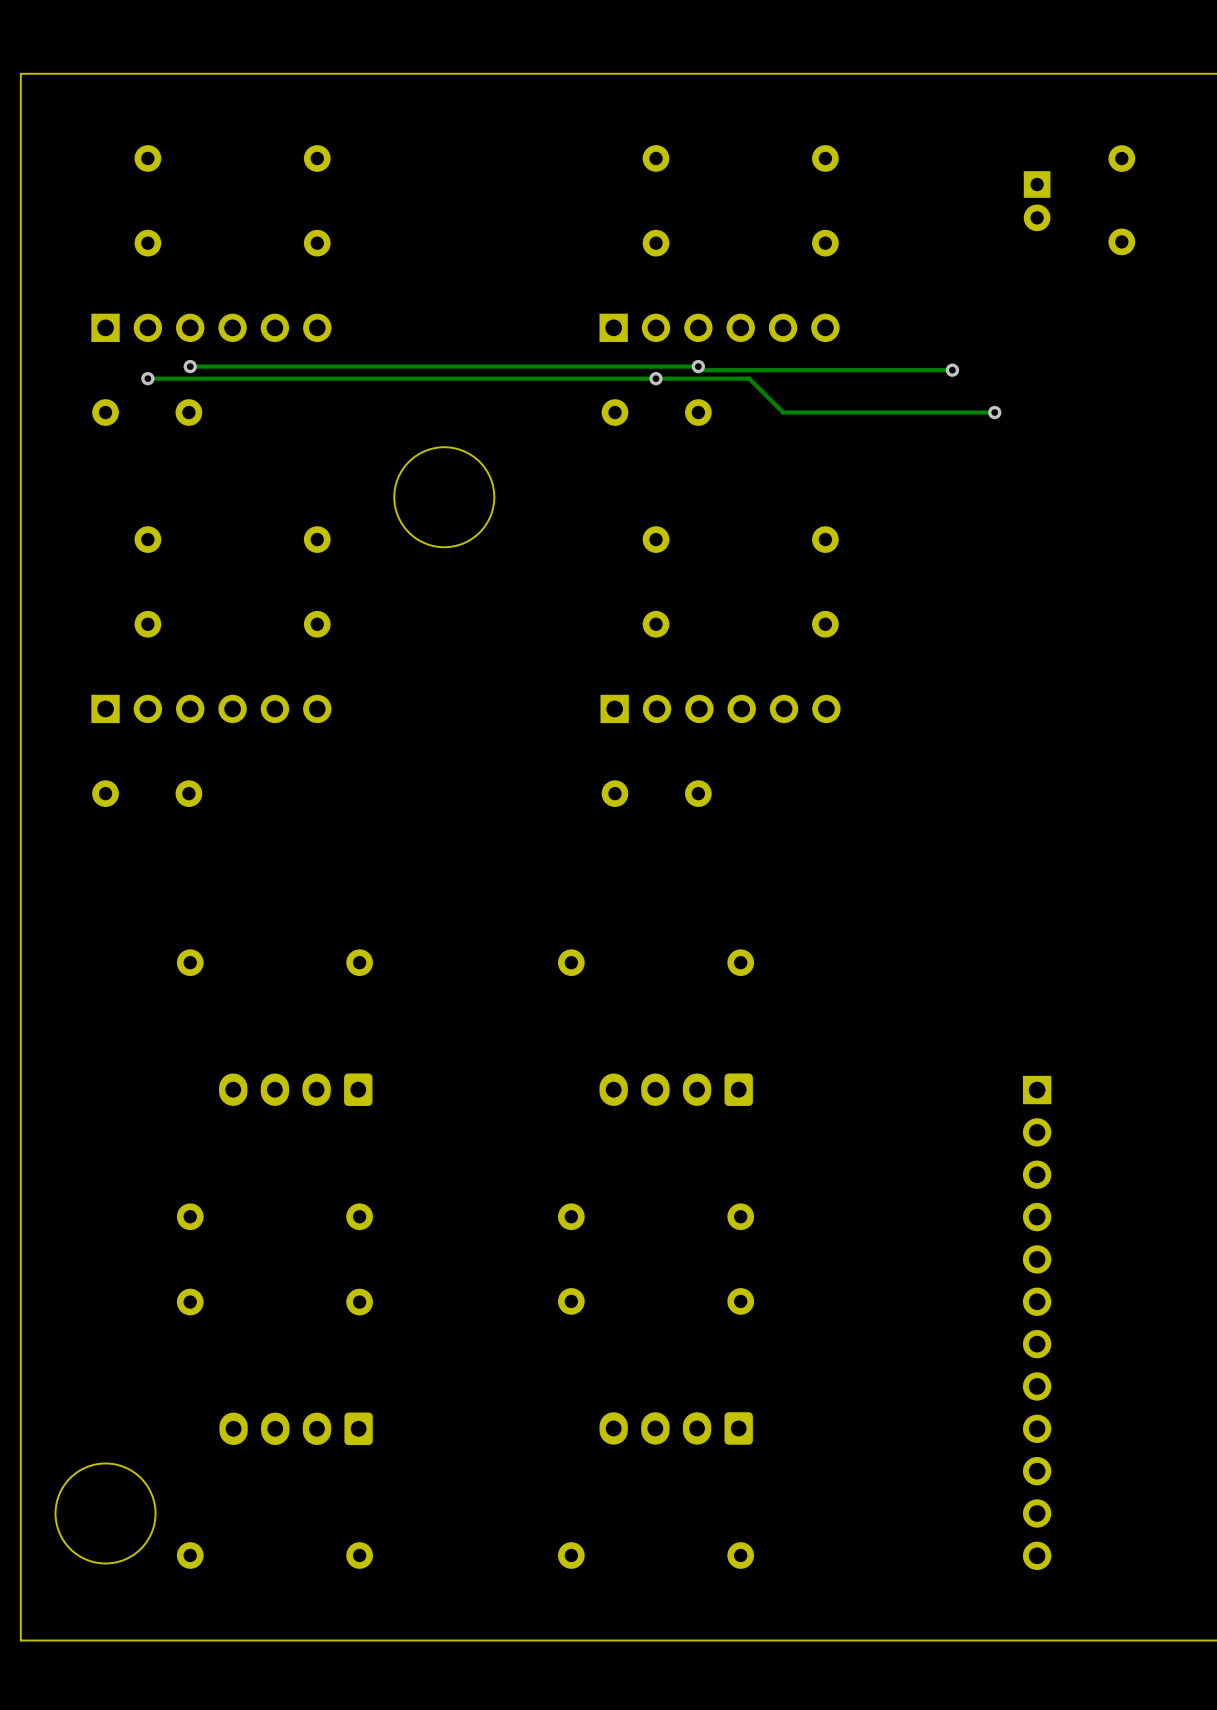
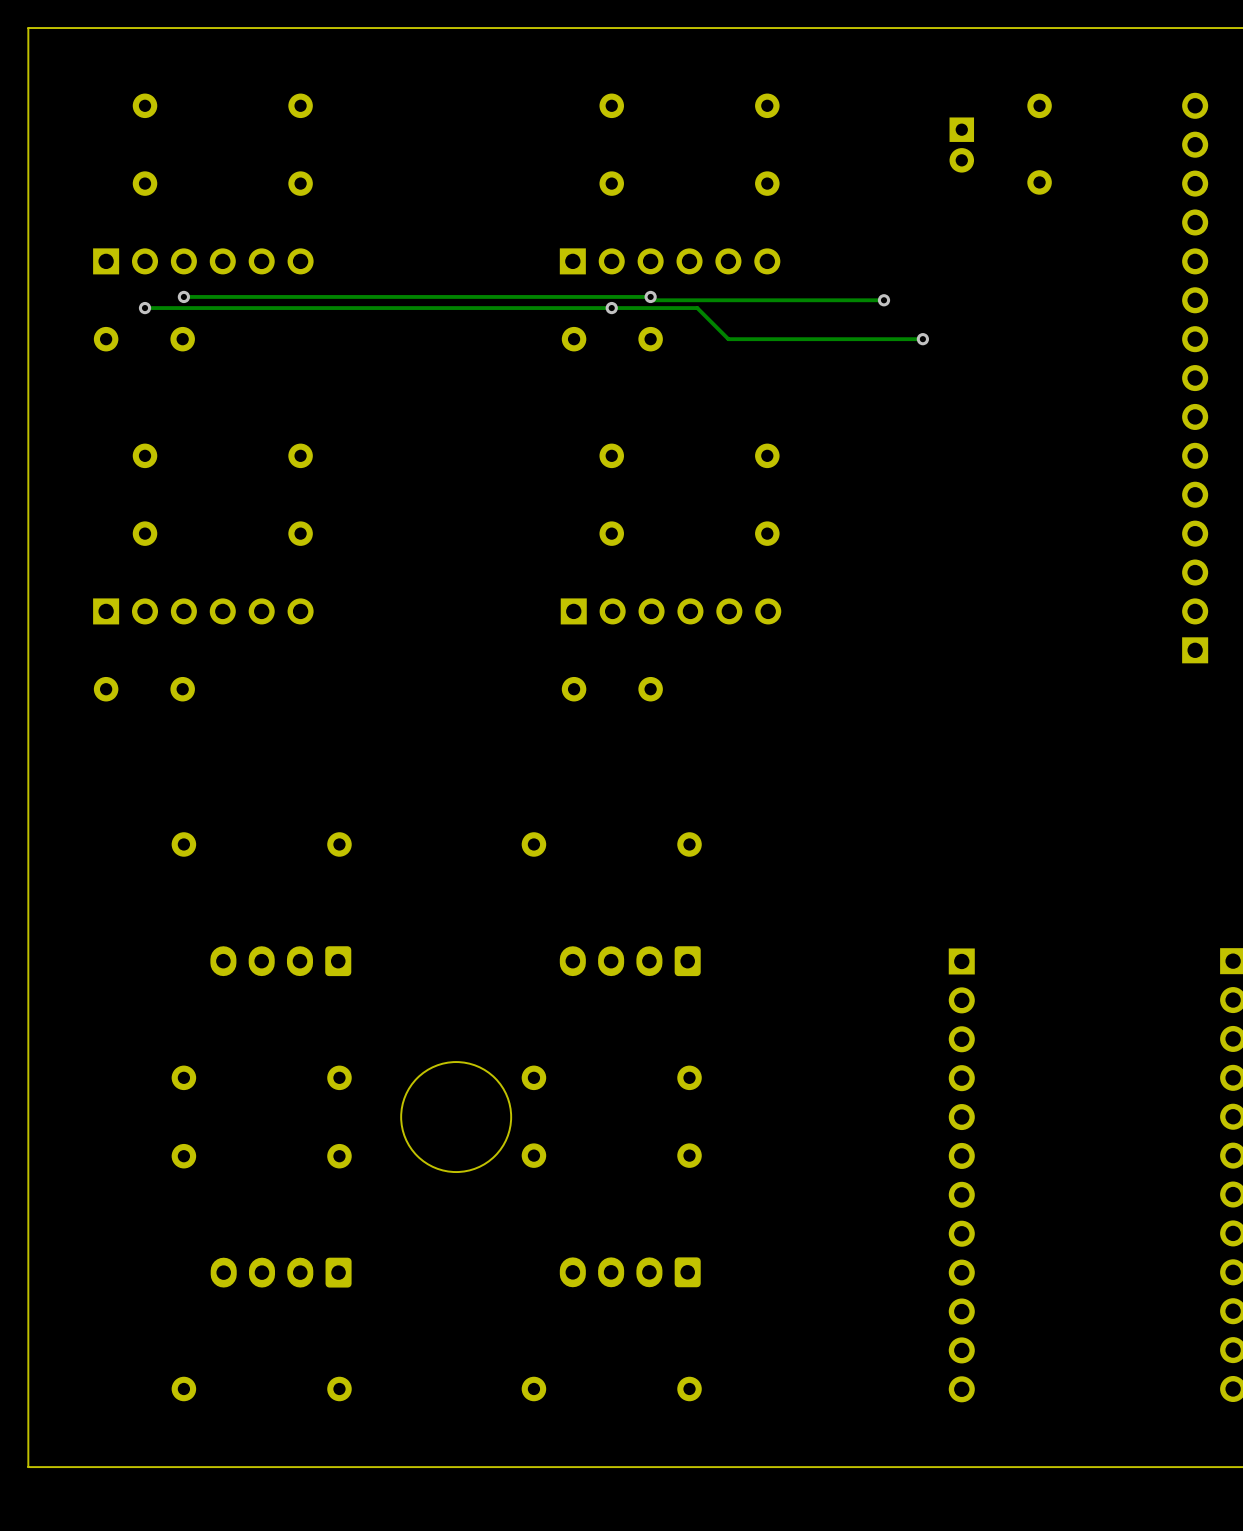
round board edge: [393, 446, 496, 549] -> none
round board edge: none -> [400, 1061, 512, 1173]
round board edge: [54, 1462, 157, 1565] -> none

